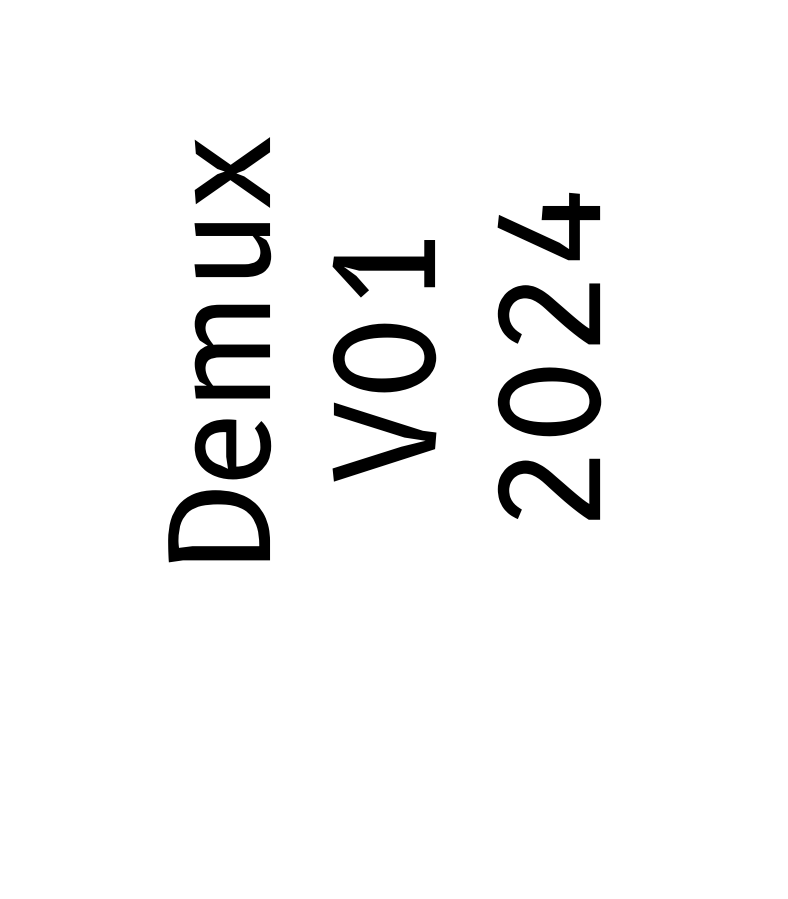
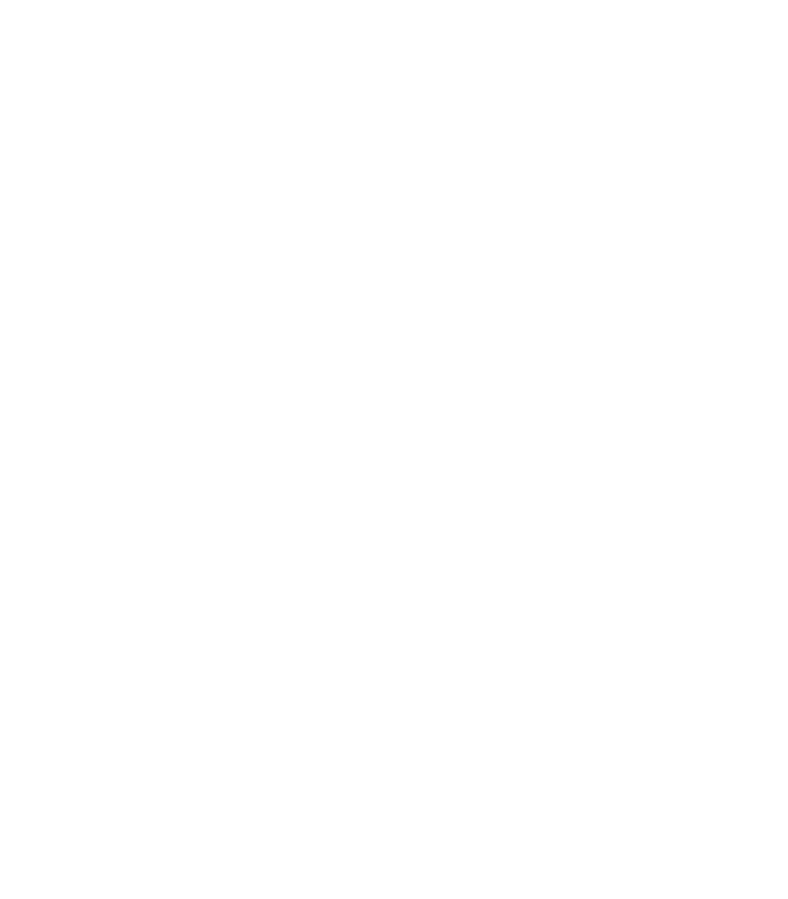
text: Demux (219, 349) -> none
text: 2024 (549, 356) -> none
text: V01 (384, 360) -> none

